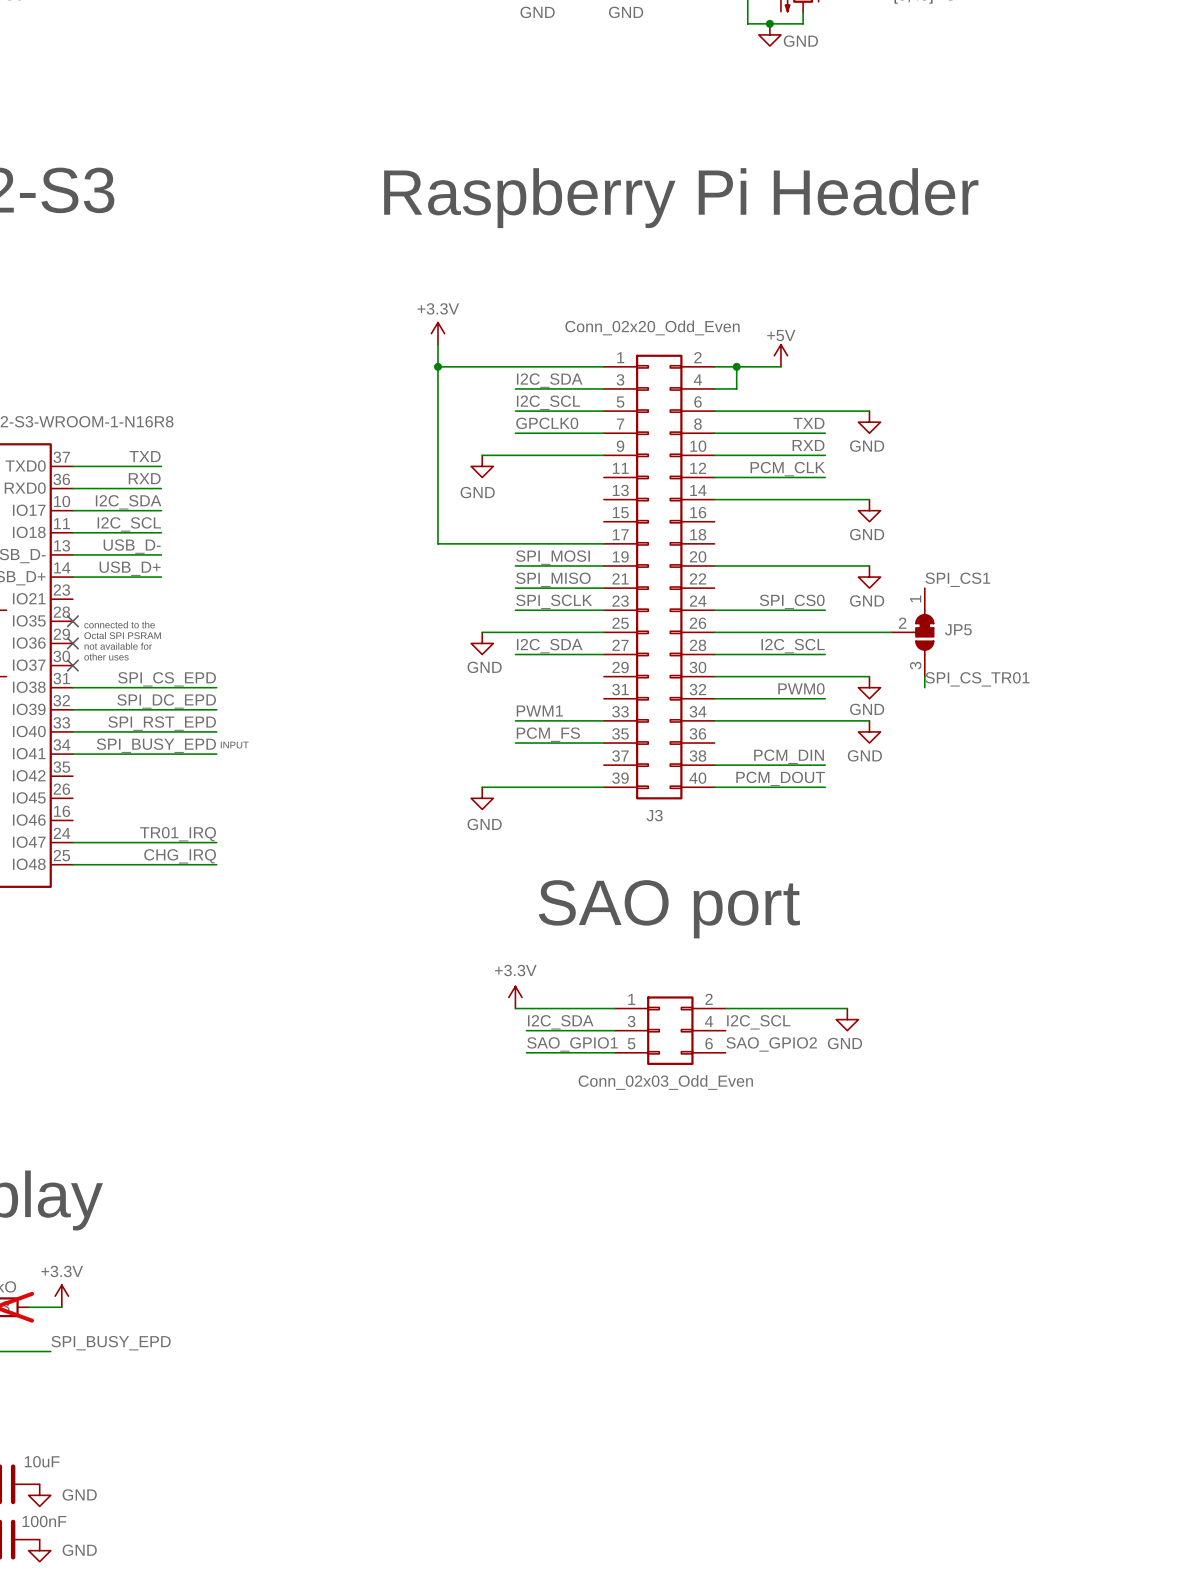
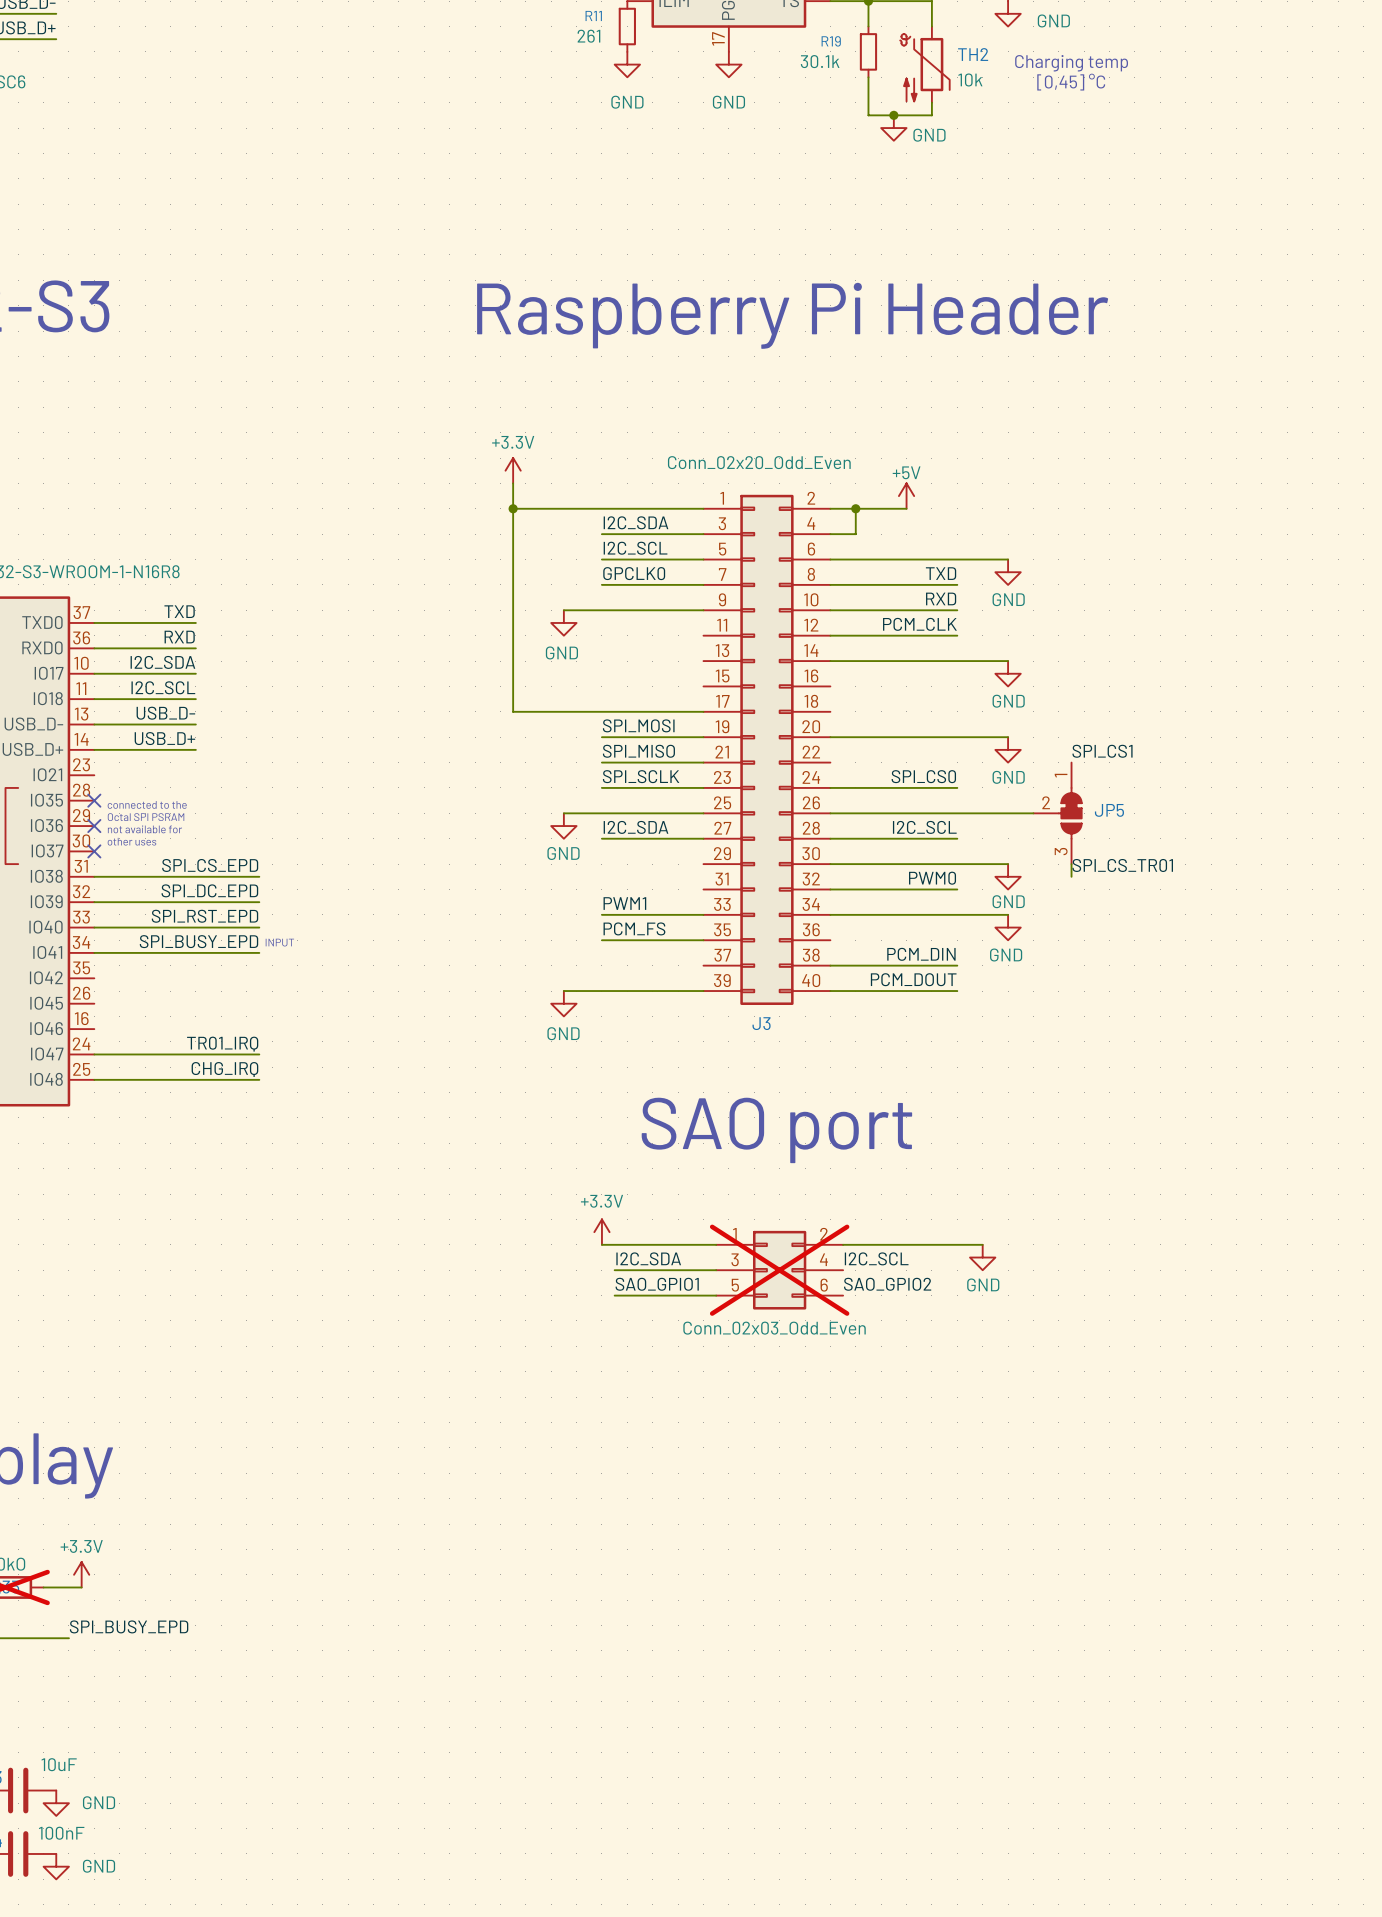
part do-not-place cross: none -> (779, 1270)

